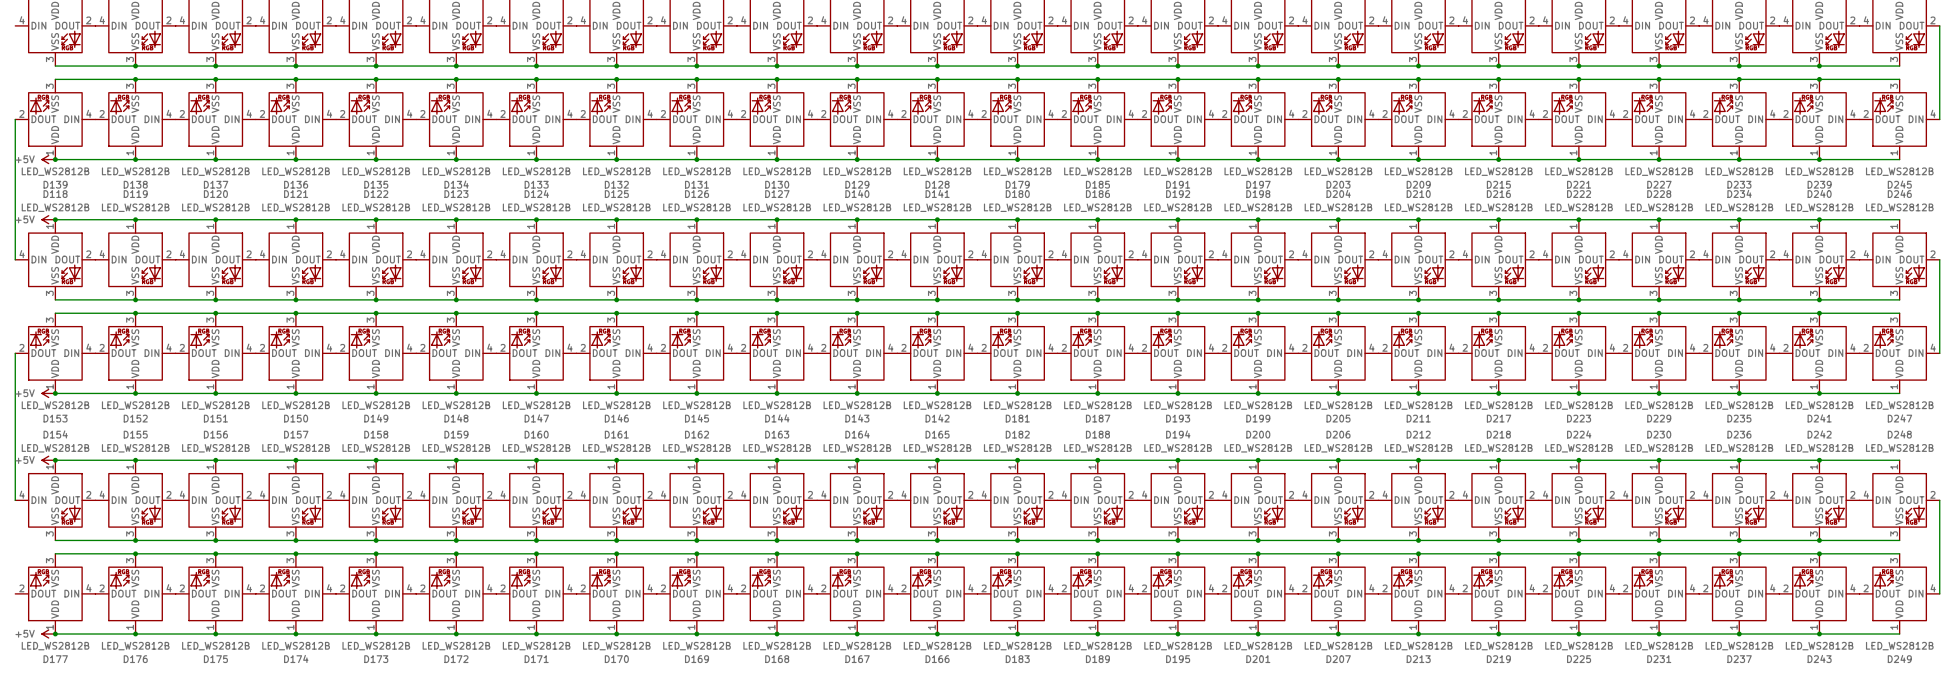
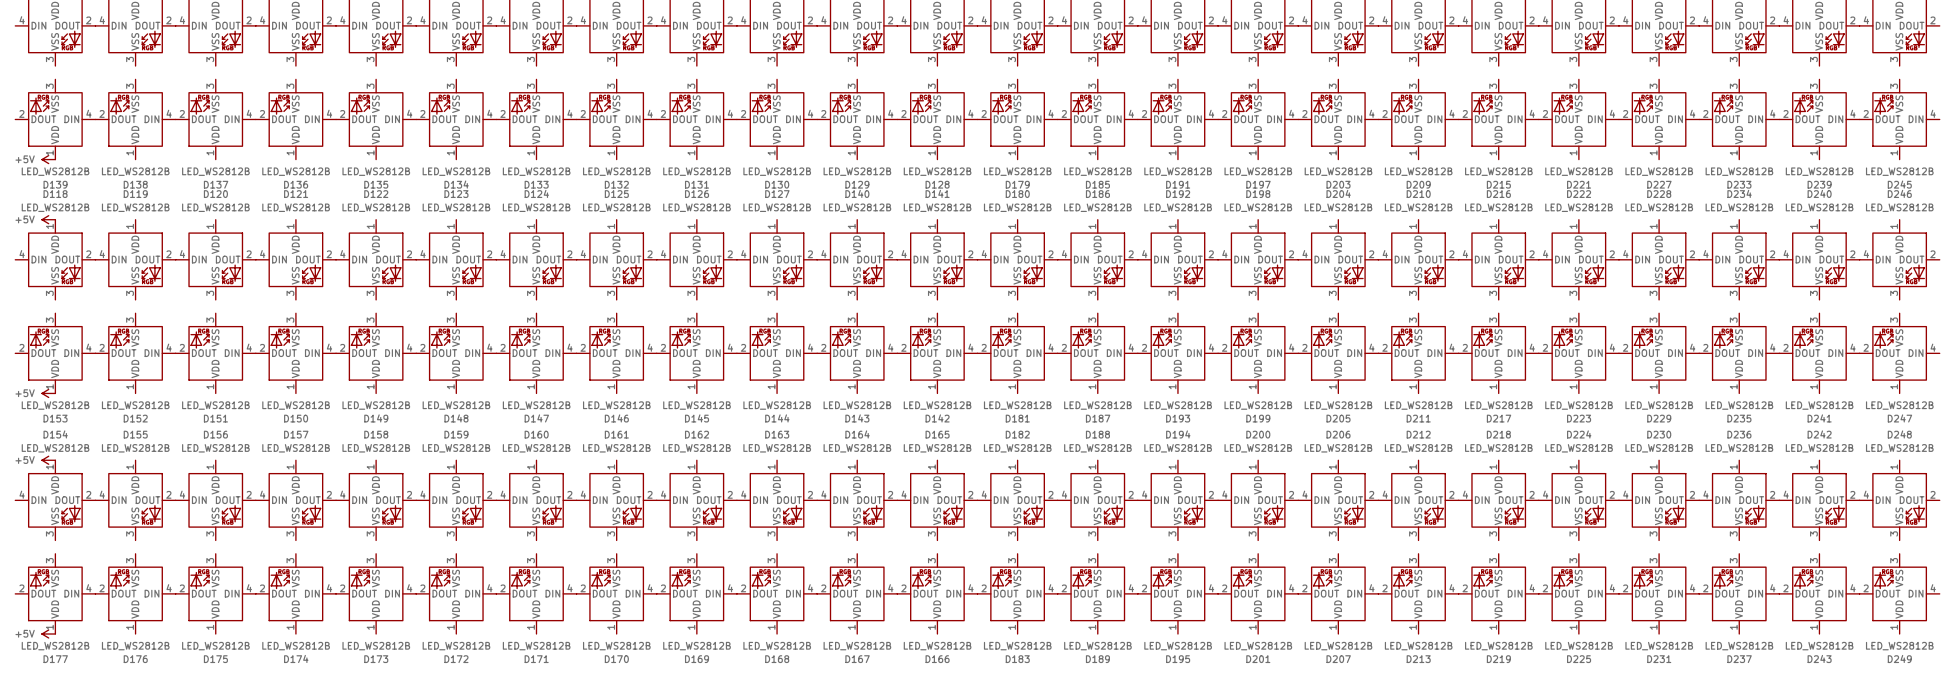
wire: (1939, 25) (1939, 119) -> none
wire: (55, 66) (1899, 66) -> none
junction: (135, 66) -> none
junction: (215, 66) -> none
junction: (295, 66) -> none
junction: (376, 66) -> none
junction: (456, 66) -> none
junction: (536, 66) -> none
junction: (616, 66) -> none
junction: (696, 66) -> none
junction: (777, 66) -> none
junction: (857, 66) -> none
junction: (937, 66) -> none
junction: (1017, 66) -> none
junction: (1097, 66) -> none
junction: (1177, 66) -> none
junction: (1258, 66) -> none
junction: (1338, 66) -> none
junction: (1418, 66) -> none
junction: (1498, 66) -> none
junction: (1578, 66) -> none
junction: (1659, 66) -> none
junction: (1739, 66) -> none
junction: (1819, 66) -> none
wire: (55, 79) (1899, 79) -> none
junction: (135, 79) -> none
junction: (215, 79) -> none
junction: (295, 79) -> none
junction: (376, 79) -> none
junction: (456, 79) -> none
junction: (536, 79) -> none
junction: (616, 79) -> none
junction: (696, 79) -> none
junction: (777, 79) -> none
junction: (857, 79) -> none
junction: (937, 79) -> none
junction: (1017, 79) -> none
junction: (1097, 79) -> none
junction: (1177, 79) -> none
junction: (1258, 79) -> none
junction: (1338, 79) -> none
junction: (1418, 79) -> none
junction: (1498, 79) -> none
junction: (1578, 79) -> none
junction: (1659, 79) -> none
junction: (1739, 79) -> none
junction: (1819, 79) -> none
wire: (15, 119) (15, 259) -> none
wire: (55, 159) (1899, 159) -> none
junction: (55, 159) -> none
junction: (135, 159) -> none
junction: (215, 159) -> none
junction: (295, 159) -> none
junction: (376, 159) -> none
junction: (456, 159) -> none
junction: (536, 159) -> none
junction: (616, 159) -> none
junction: (696, 159) -> none
junction: (777, 159) -> none
junction: (857, 159) -> none
junction: (937, 159) -> none
junction: (1017, 159) -> none
junction: (1097, 159) -> none
junction: (1177, 159) -> none
junction: (1258, 159) -> none
junction: (1338, 159) -> none
junction: (1418, 159) -> none
junction: (1498, 159) -> none
junction: (1578, 159) -> none
junction: (1659, 159) -> none
junction: (1739, 159) -> none
junction: (1819, 159) -> none
wire: (55, 219) (1899, 219) -> none
junction: (55, 219) -> none
junction: (135, 219) -> none
junction: (215, 219) -> none
junction: (295, 219) -> none
junction: (376, 219) -> none
junction: (456, 219) -> none
junction: (536, 219) -> none
junction: (616, 219) -> none
junction: (696, 219) -> none
junction: (777, 219) -> none
junction: (857, 219) -> none
junction: (937, 219) -> none
junction: (1017, 219) -> none
junction: (1097, 219) -> none
junction: (1177, 219) -> none
junction: (1258, 219) -> none
junction: (1338, 219) -> none
junction: (1418, 219) -> none
junction: (1498, 219) -> none
junction: (1578, 219) -> none
junction: (1659, 219) -> none
junction: (1739, 219) -> none
junction: (1819, 219) -> none
wire: (1939, 259) (1939, 353) -> none
wire: (55, 299) (1899, 299) -> none
junction: (135, 299) -> none
junction: (215, 299) -> none
junction: (295, 299) -> none
junction: (376, 299) -> none
junction: (456, 299) -> none
junction: (536, 299) -> none
junction: (616, 299) -> none
junction: (696, 299) -> none
junction: (777, 299) -> none
junction: (857, 299) -> none
junction: (937, 299) -> none
junction: (1017, 299) -> none
junction: (1097, 299) -> none
junction: (1177, 299) -> none
junction: (1258, 299) -> none
junction: (1338, 299) -> none
junction: (1418, 299) -> none
junction: (1498, 299) -> none
junction: (1578, 299) -> none
junction: (1659, 299) -> none
junction: (1739, 299) -> none
junction: (1819, 299) -> none
wire: (55, 313) (1899, 313) -> none
junction: (135, 313) -> none
junction: (215, 313) -> none
junction: (295, 313) -> none
junction: (376, 313) -> none
junction: (456, 313) -> none
junction: (536, 313) -> none
junction: (616, 313) -> none
junction: (696, 313) -> none
junction: (777, 313) -> none
junction: (857, 313) -> none
junction: (937, 313) -> none
junction: (1017, 313) -> none
junction: (1097, 313) -> none
junction: (1177, 313) -> none
junction: (1258, 313) -> none
junction: (1338, 313) -> none
junction: (1418, 313) -> none
junction: (1498, 313) -> none
junction: (1578, 313) -> none
junction: (1659, 313) -> none
junction: (1739, 313) -> none
junction: (1819, 313) -> none
wire: (15, 353) (15, 500) -> none
wire: (55, 393) (1899, 393) -> none
junction: (55, 393) -> none
junction: (135, 393) -> none
junction: (215, 393) -> none
junction: (295, 393) -> none
junction: (376, 393) -> none
junction: (456, 393) -> none
junction: (536, 393) -> none
junction: (616, 393) -> none
junction: (696, 393) -> none
junction: (777, 393) -> none
junction: (857, 393) -> none
junction: (937, 393) -> none
junction: (1017, 393) -> none
junction: (1097, 393) -> none
junction: (1177, 393) -> none
junction: (1258, 393) -> none
junction: (1338, 393) -> none
junction: (1418, 393) -> none
junction: (1498, 393) -> none
junction: (1578, 393) -> none
junction: (1659, 393) -> none
junction: (1739, 393) -> none
junction: (1819, 393) -> none
wire: (55, 460) (1899, 460) -> none
junction: (55, 460) -> none
junction: (135, 460) -> none
junction: (215, 460) -> none
junction: (295, 460) -> none
junction: (376, 460) -> none
junction: (456, 460) -> none
junction: (536, 460) -> none
junction: (616, 460) -> none
junction: (696, 460) -> none
junction: (777, 460) -> none
junction: (857, 460) -> none
junction: (937, 460) -> none
junction: (1017, 460) -> none
junction: (1097, 460) -> none
junction: (1177, 460) -> none
junction: (1258, 460) -> none
junction: (1338, 460) -> none
junction: (1418, 460) -> none
junction: (1498, 460) -> none
junction: (1578, 460) -> none
junction: (1659, 460) -> none
junction: (1739, 460) -> none
junction: (1819, 460) -> none
wire: (1939, 500) (1939, 593) -> none
wire: (55, 540) (1899, 540) -> none
junction: (135, 540) -> none
junction: (215, 540) -> none
junction: (295, 540) -> none
junction: (376, 540) -> none
junction: (456, 540) -> none
junction: (536, 540) -> none
junction: (616, 540) -> none
junction: (696, 540) -> none
junction: (777, 540) -> none
junction: (857, 540) -> none
junction: (937, 540) -> none
junction: (1017, 540) -> none
junction: (1097, 540) -> none
junction: (1177, 540) -> none
junction: (1258, 540) -> none
junction: (1338, 540) -> none
junction: (1418, 540) -> none
junction: (1498, 540) -> none
junction: (1578, 540) -> none
junction: (1659, 540) -> none
junction: (1739, 540) -> none
junction: (1819, 540) -> none
wire: (55, 553) (1899, 553) -> none
junction: (135, 553) -> none
junction: (215, 553) -> none
junction: (295, 553) -> none
junction: (376, 553) -> none
junction: (456, 553) -> none
junction: (536, 553) -> none
junction: (616, 553) -> none
junction: (696, 553) -> none
junction: (777, 553) -> none
junction: (857, 553) -> none
junction: (937, 553) -> none
junction: (1017, 553) -> none
junction: (1097, 553) -> none
junction: (1177, 553) -> none
junction: (1258, 553) -> none
junction: (1338, 553) -> none
junction: (1418, 553) -> none
junction: (1498, 553) -> none
junction: (1578, 553) -> none
junction: (1659, 553) -> none
junction: (1739, 553) -> none
junction: (1819, 553) -> none
wire: (55, 634) (1899, 634) -> none
junction: (55, 634) -> none
junction: (135, 634) -> none
junction: (215, 634) -> none
junction: (295, 634) -> none
junction: (376, 634) -> none
junction: (456, 634) -> none
junction: (536, 634) -> none
junction: (616, 634) -> none
junction: (696, 634) -> none
junction: (777, 634) -> none
junction: (857, 634) -> none
junction: (937, 634) -> none
junction: (1017, 634) -> none
junction: (1097, 634) -> none
junction: (1177, 634) -> none
junction: (1258, 634) -> none
junction: (1338, 634) -> none
junction: (1418, 634) -> none
junction: (1498, 634) -> none
junction: (1578, 634) -> none
junction: (1659, 634) -> none
junction: (1739, 634) -> none
junction: (1819, 634) -> none

